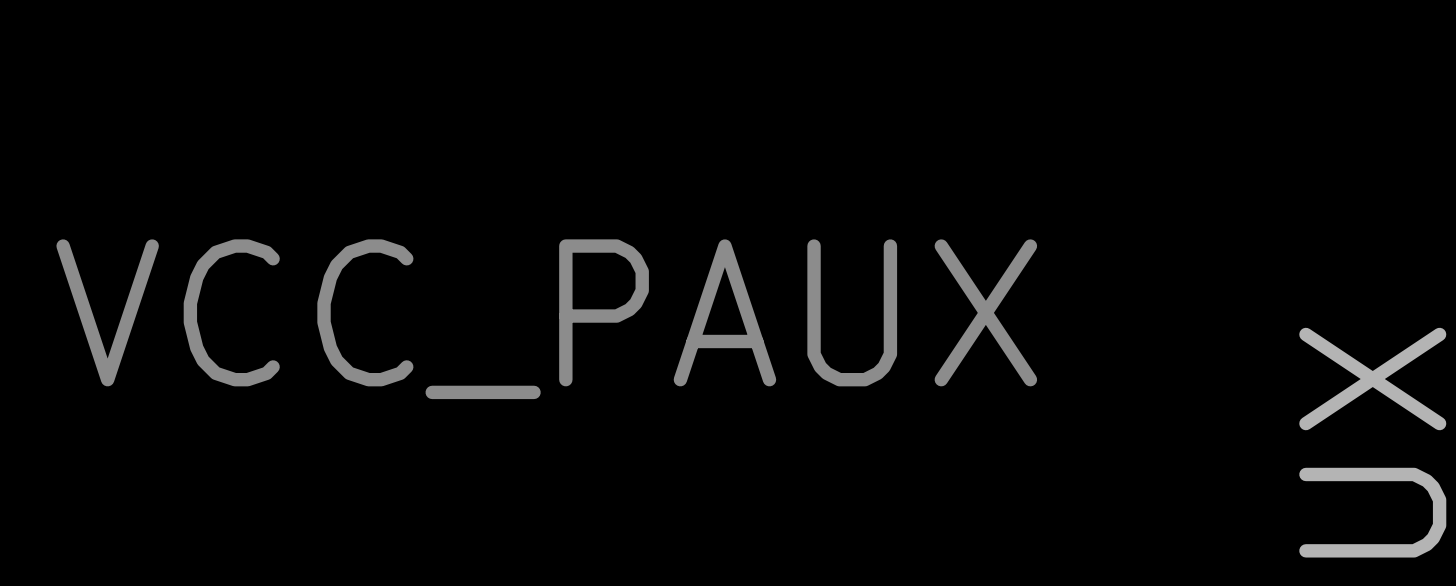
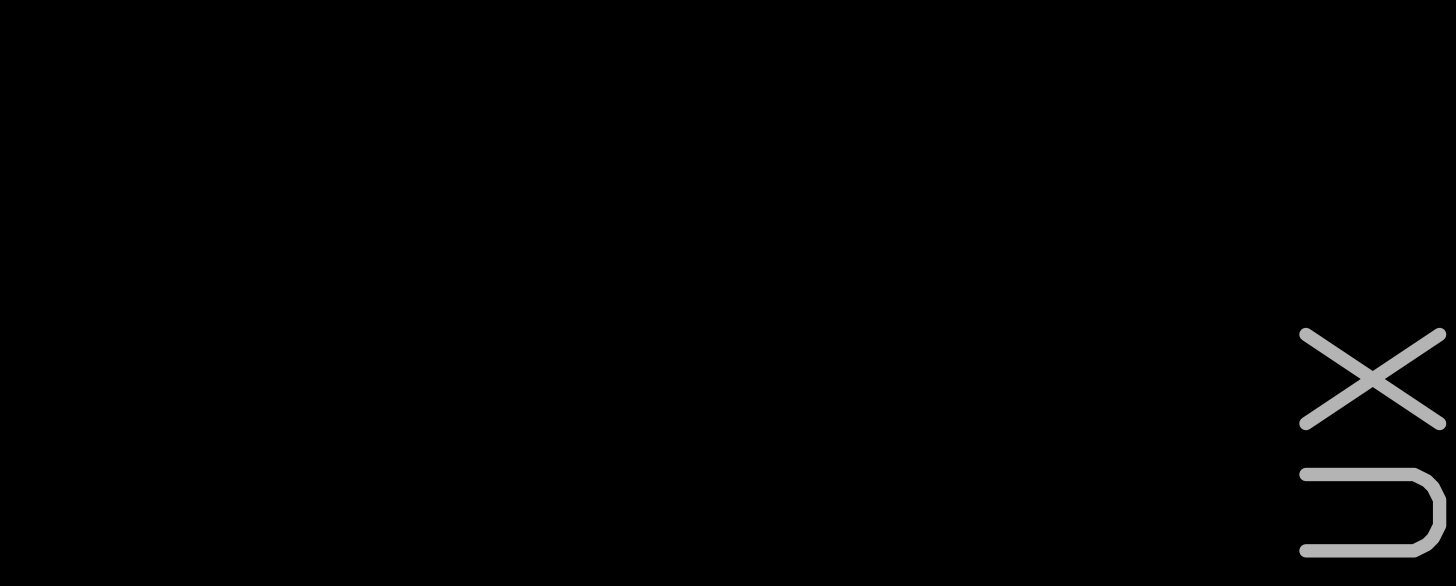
text: VCC_PAUX (546, 319) -> none

